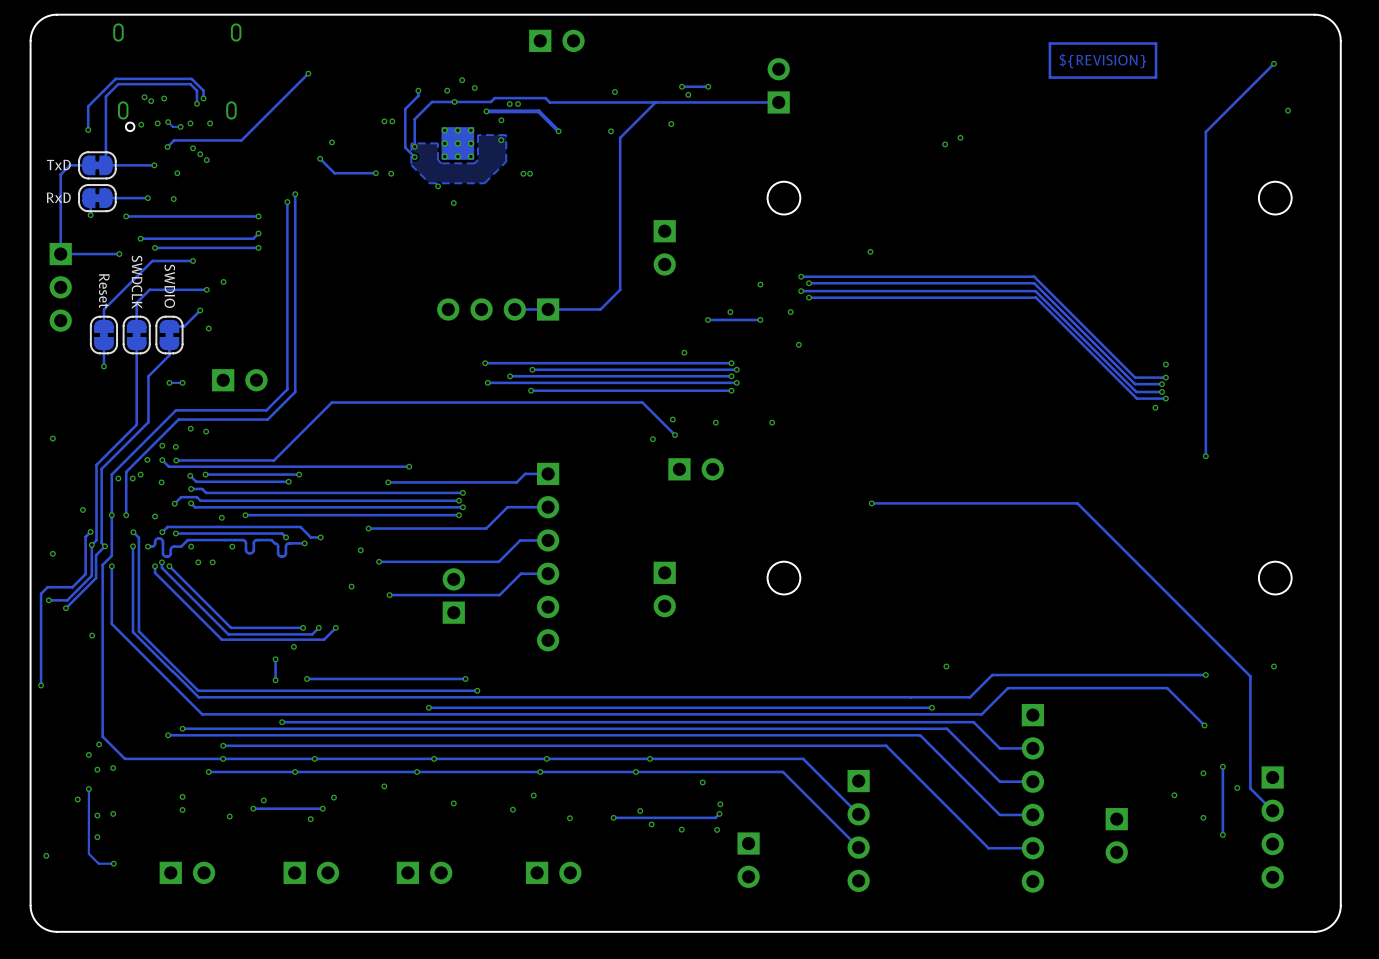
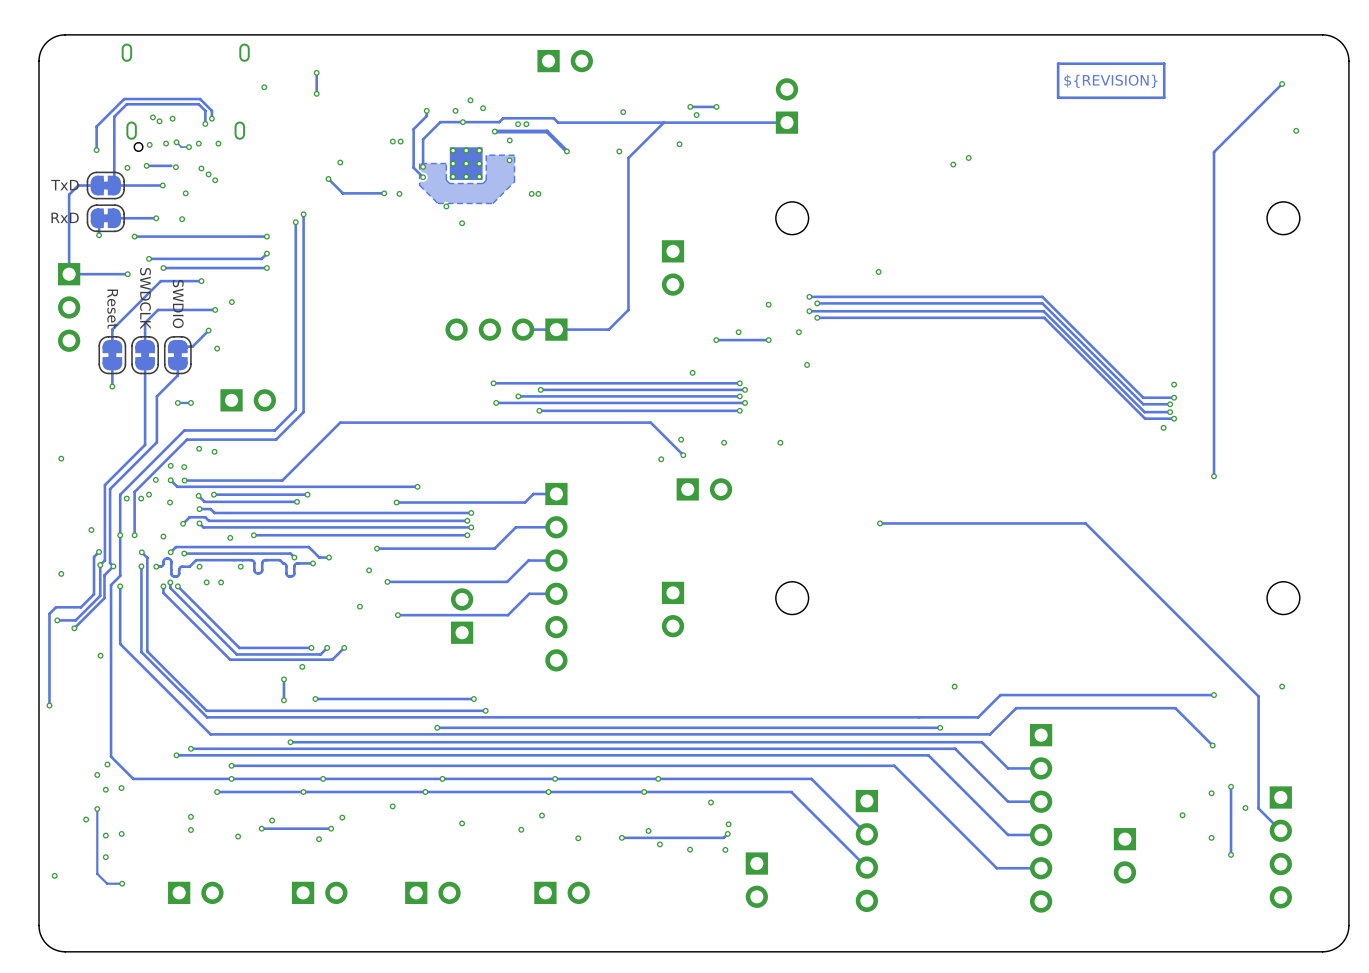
via: none -> (316, 72)
via: none -> (264, 87)
track: (308, 73) (241, 140) (174, 140) (167, 147) -> (316, 93) (316, 72)
via: none -> (146, 165)
track: none -> (171, 165) (146, 165)
via: none -> (127, 167)

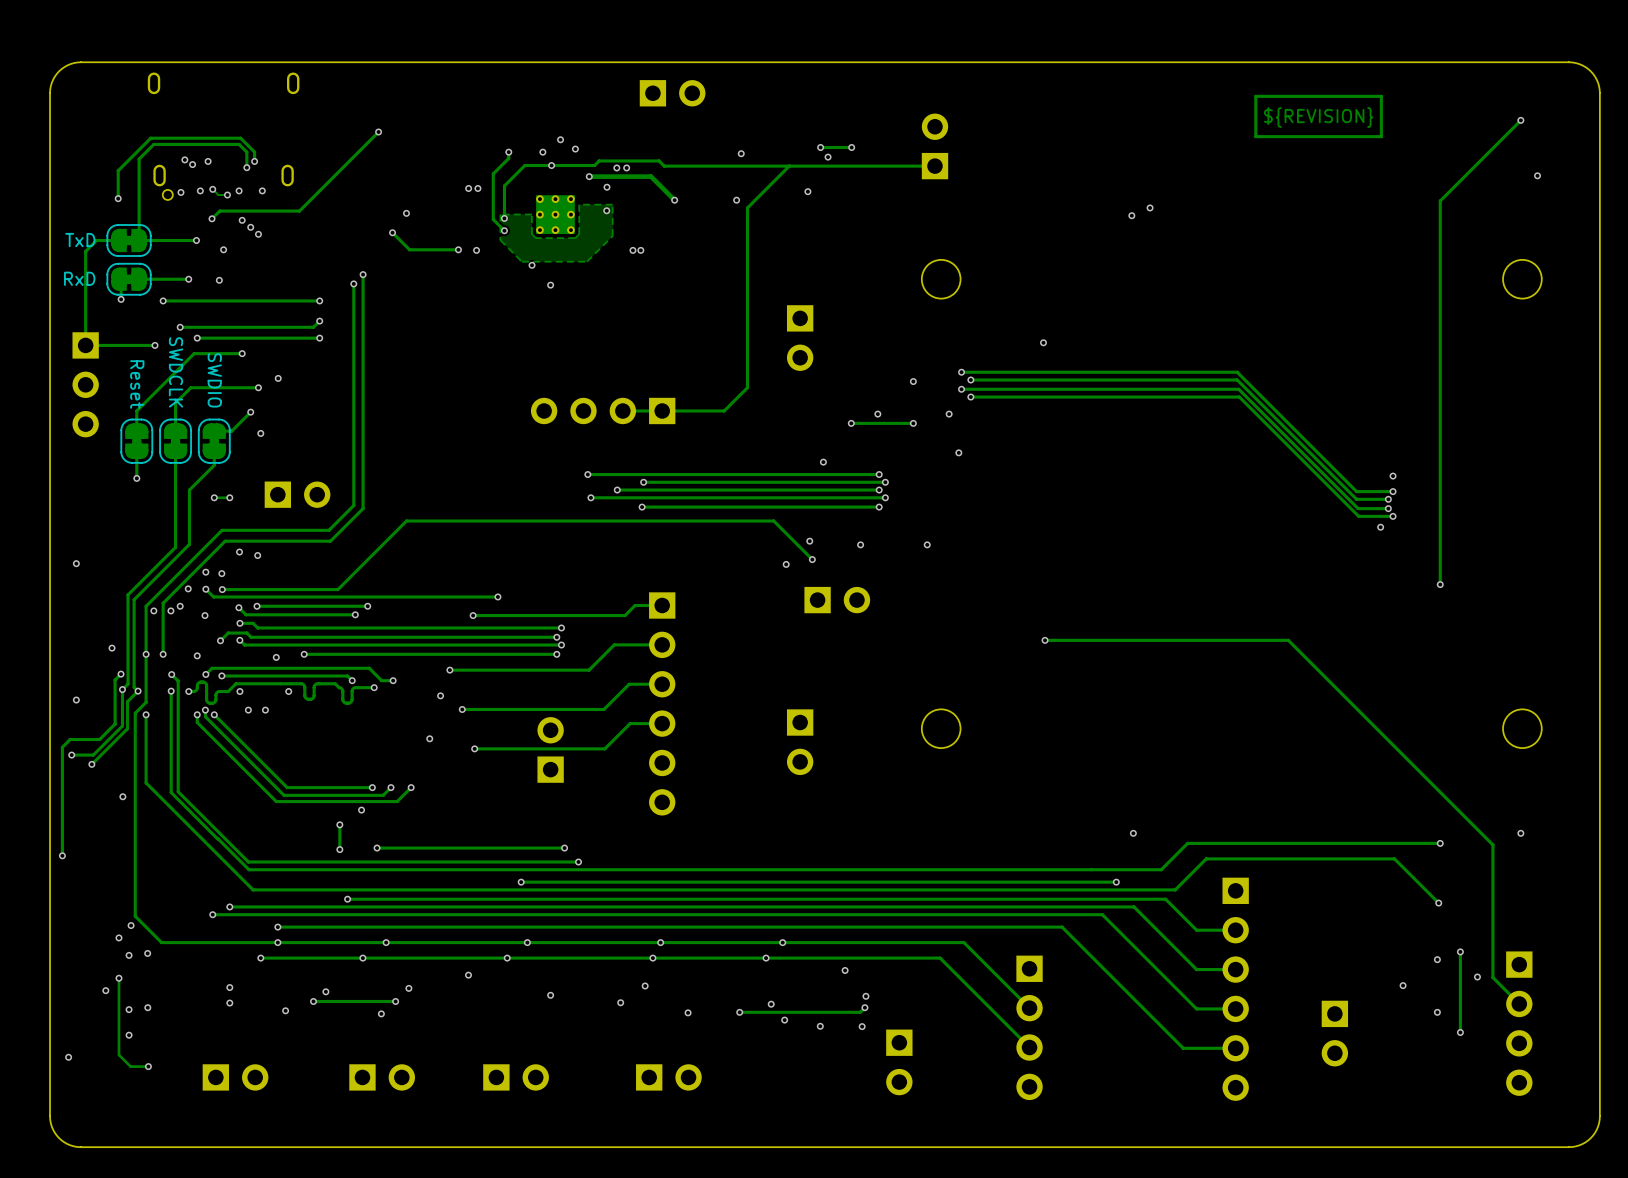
track: (316, 72) (316, 93) -> (212, 218) (219, 211) (299, 211) (378, 132)
via: (316, 72) -> none
via: (264, 87) -> none
via: (146, 165) -> none
track: (171, 165) (146, 165) -> none
via: (127, 167) -> none

